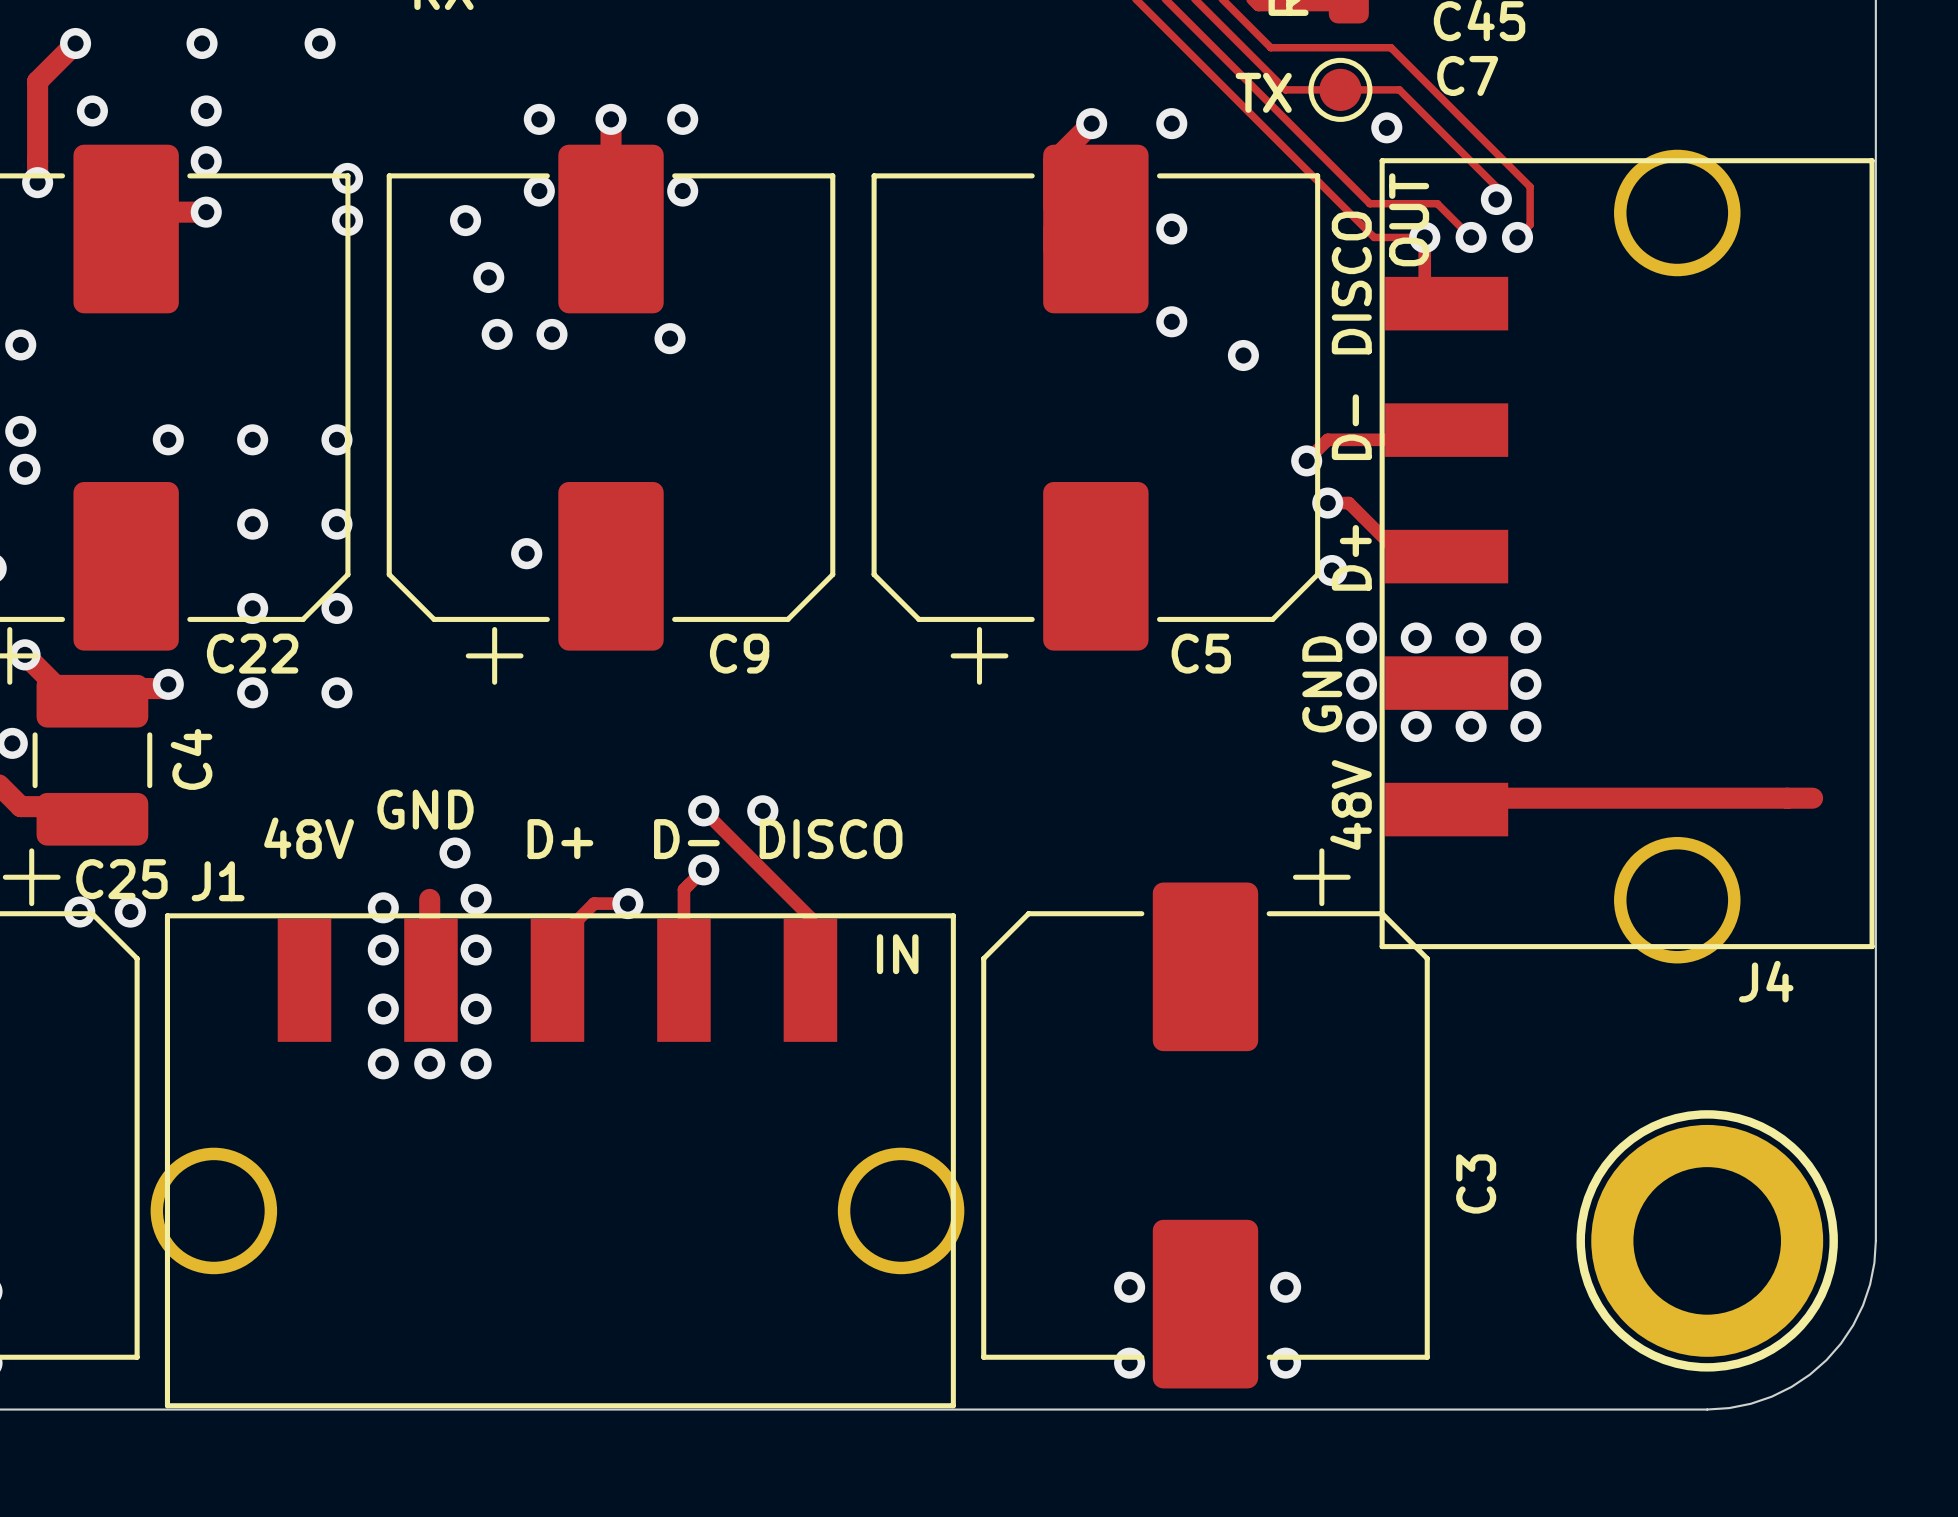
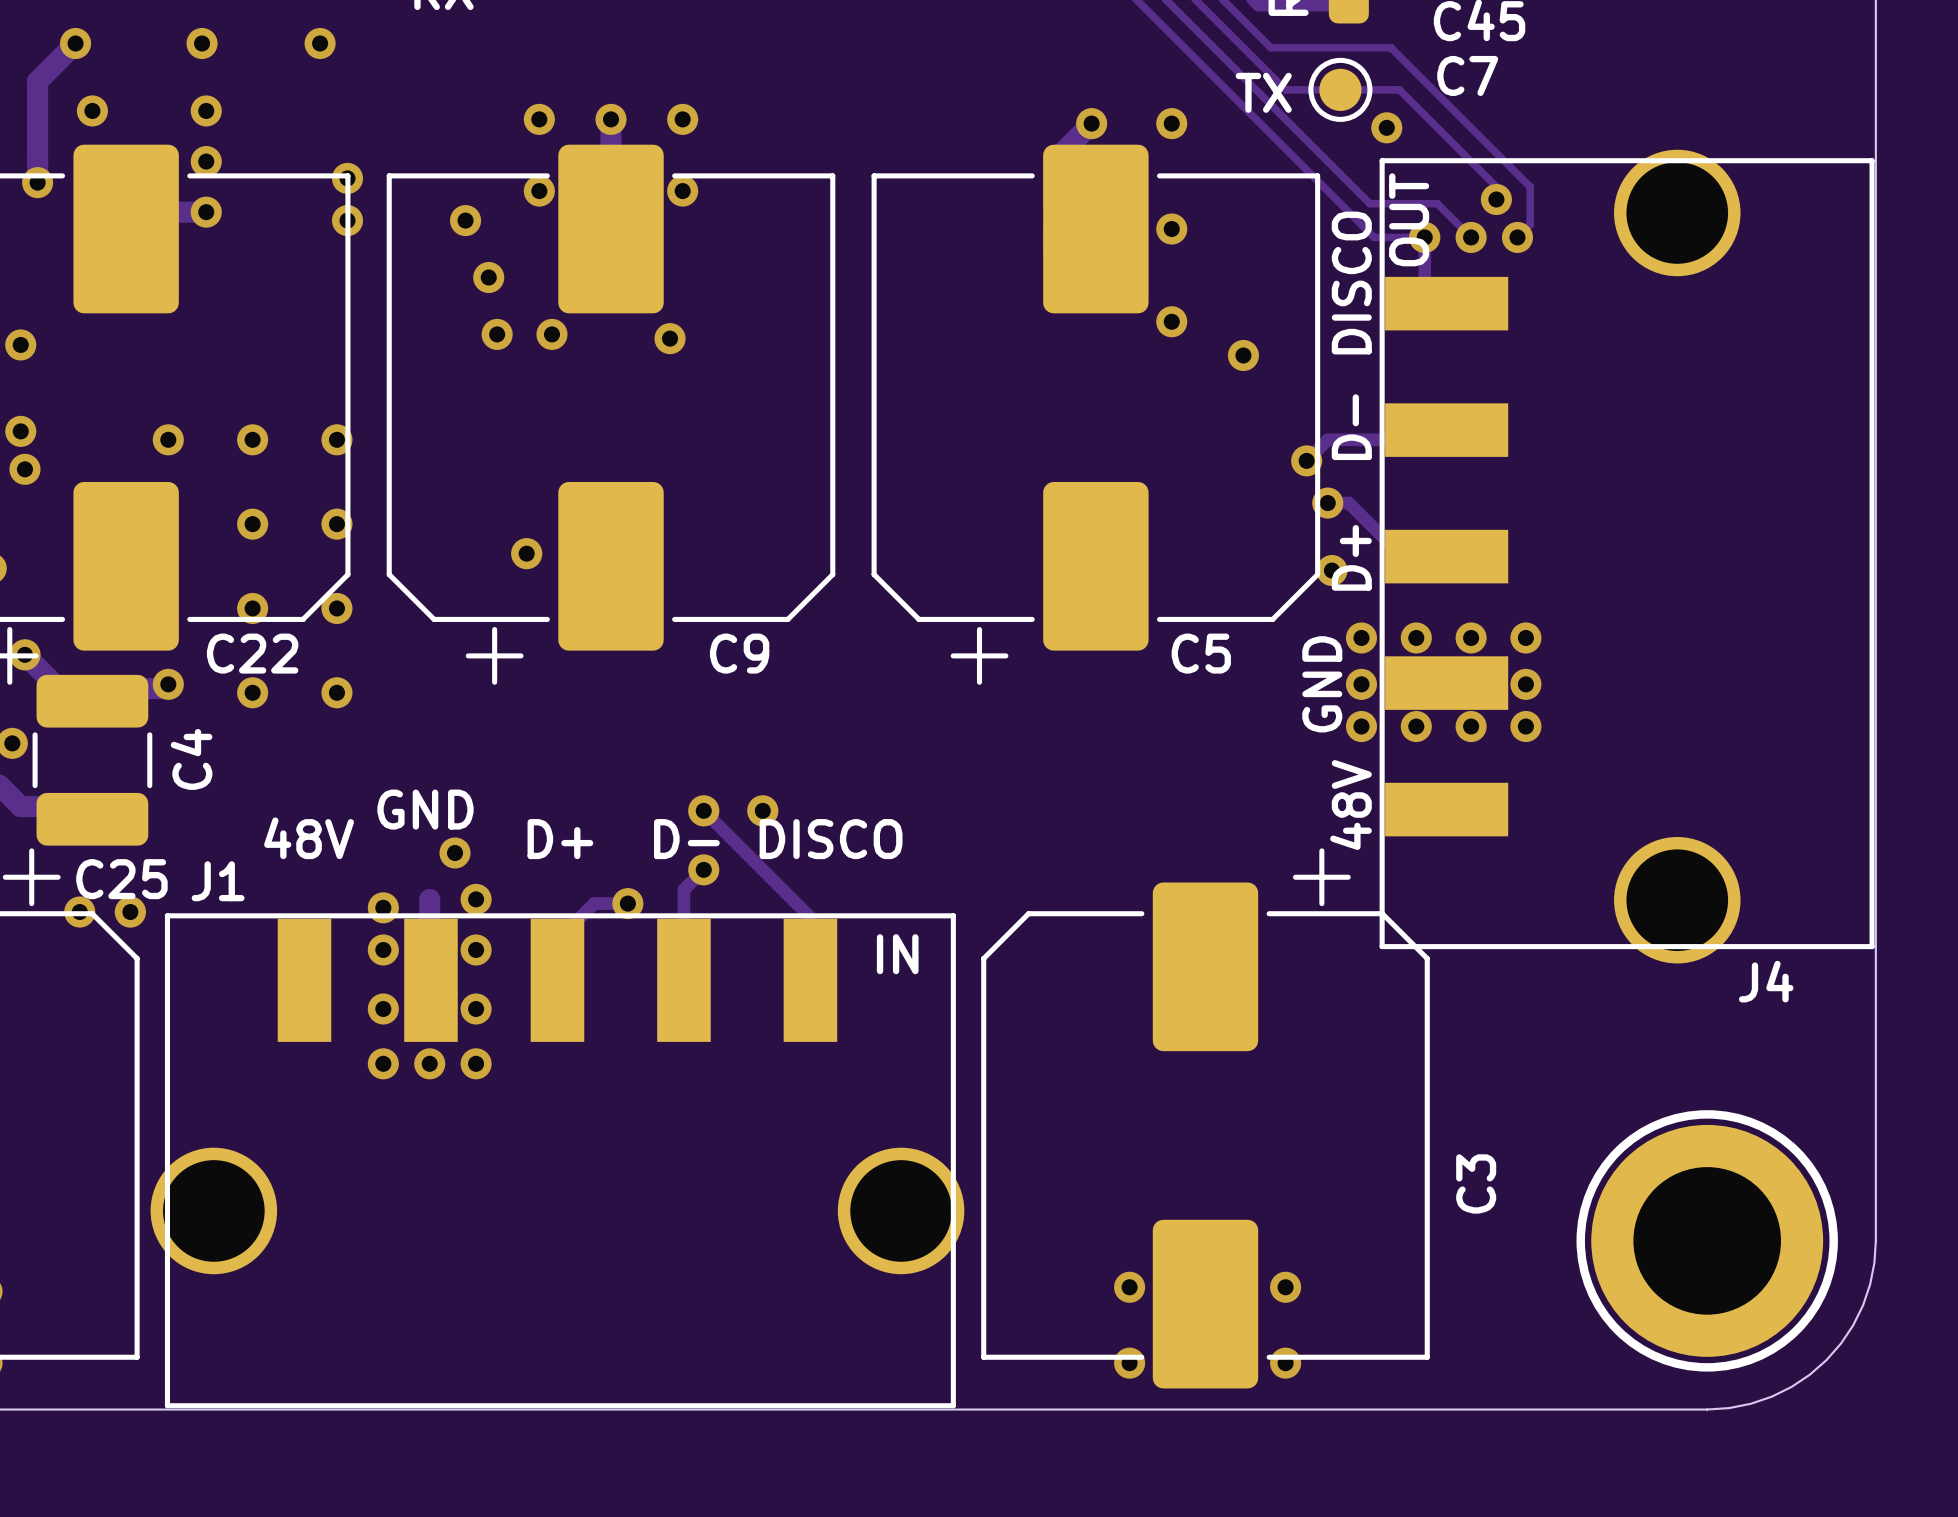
track: (1451, 798) (1812, 798) -> none

